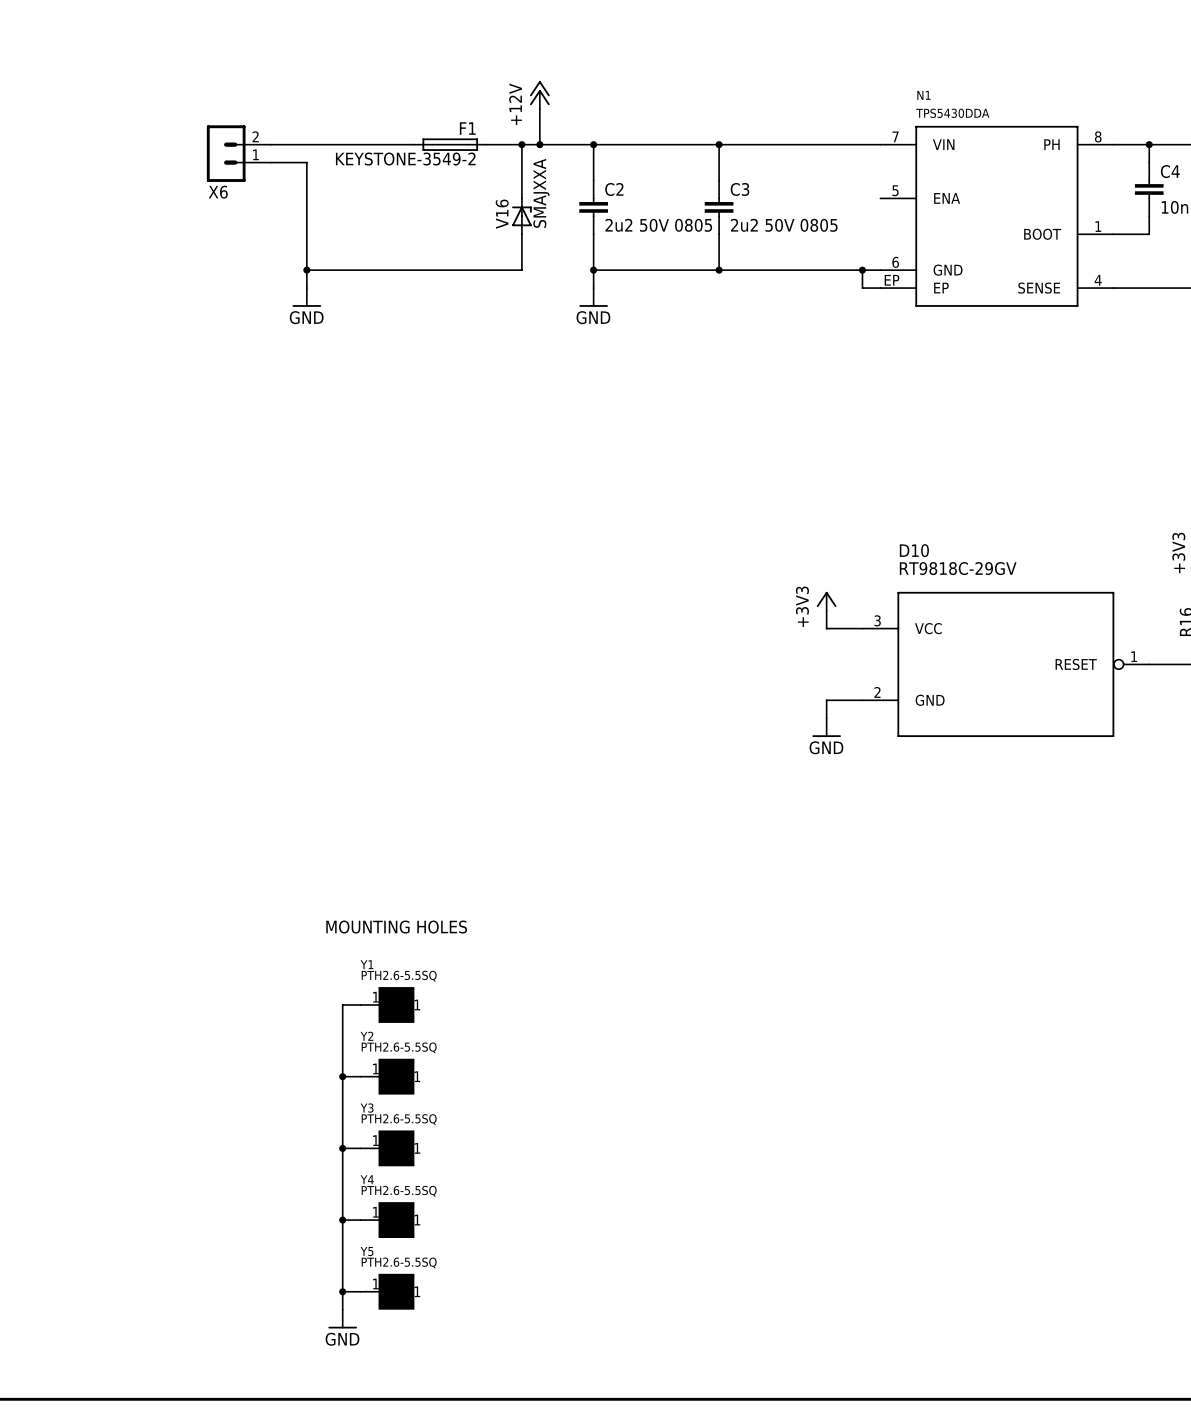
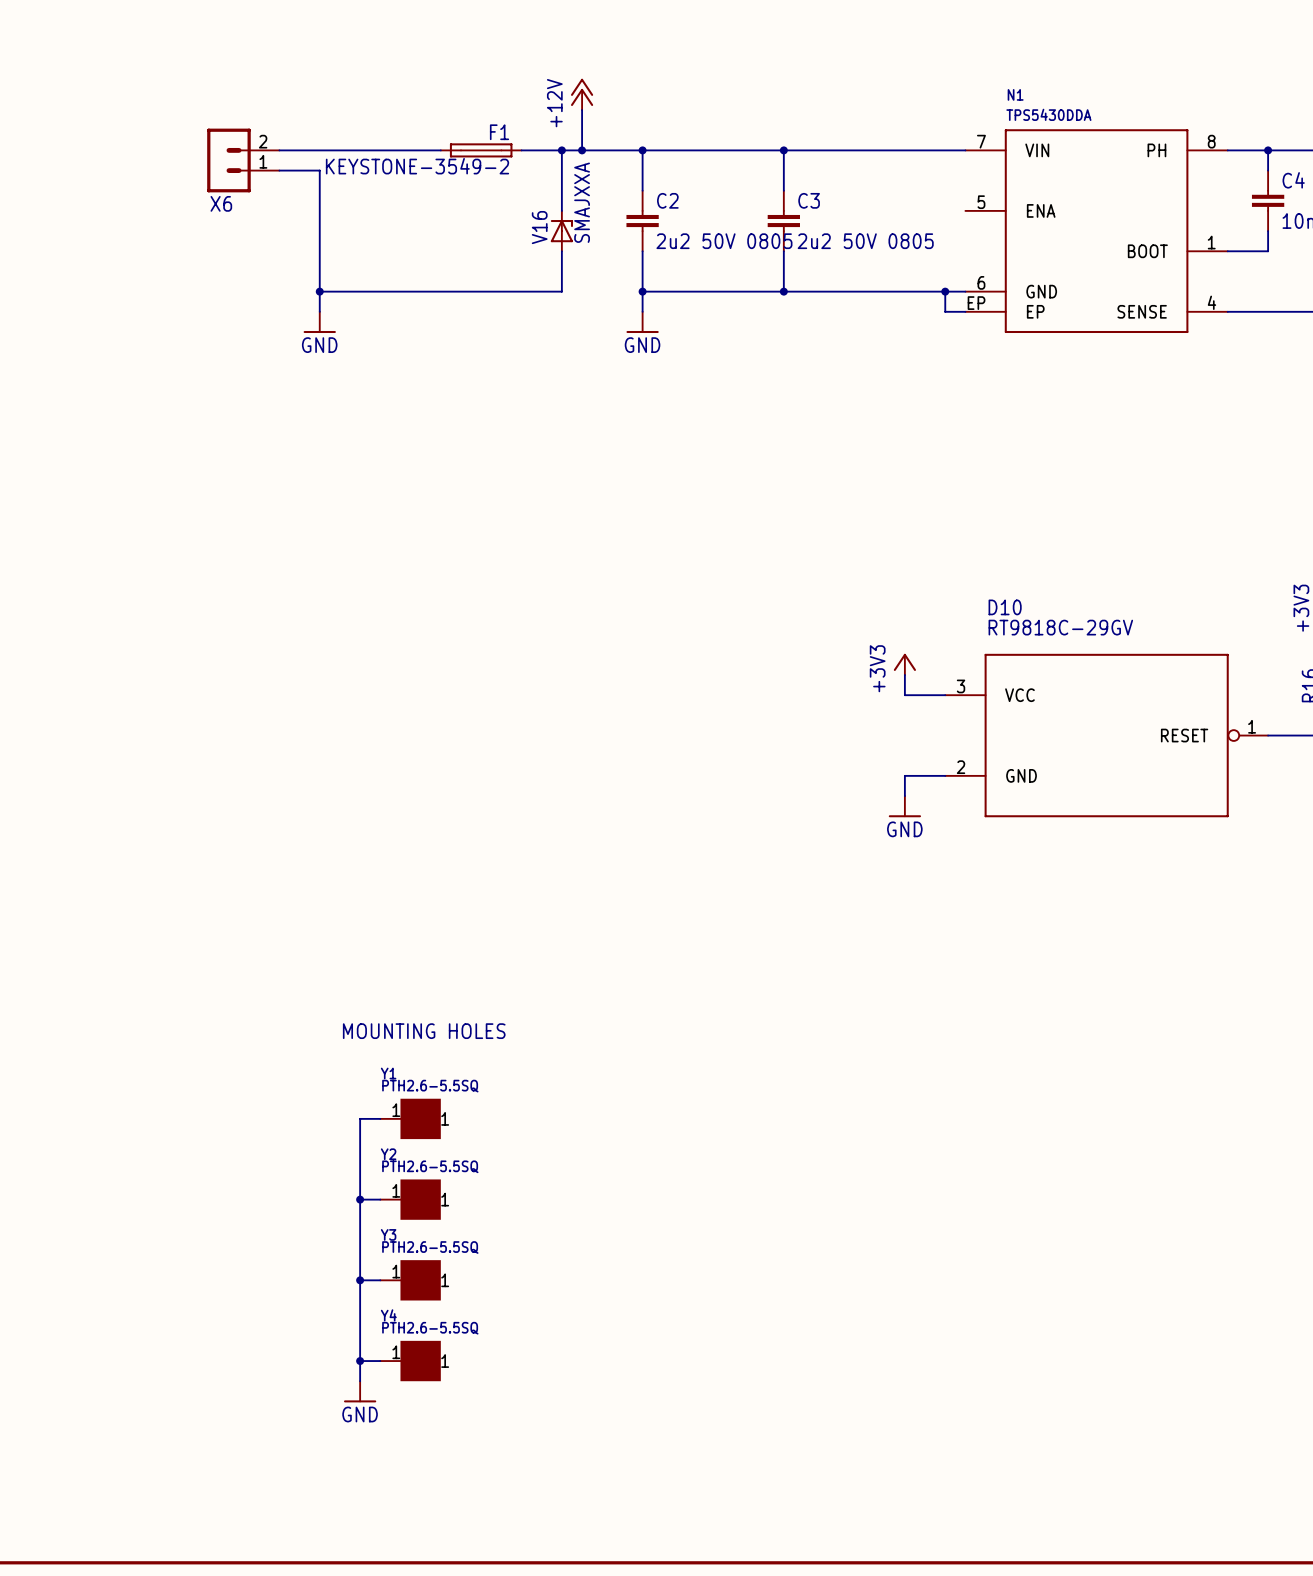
wire: (342, 1237) (342, 1309) -> none
wire: (342, 1291) (360, 1291) -> none
junction: (342, 1291) -> none
Y5: PTH2.6-5.5SQ (387, 1291) -> none
power symbol position: GND (342, 1319) -> GND (360, 1391)

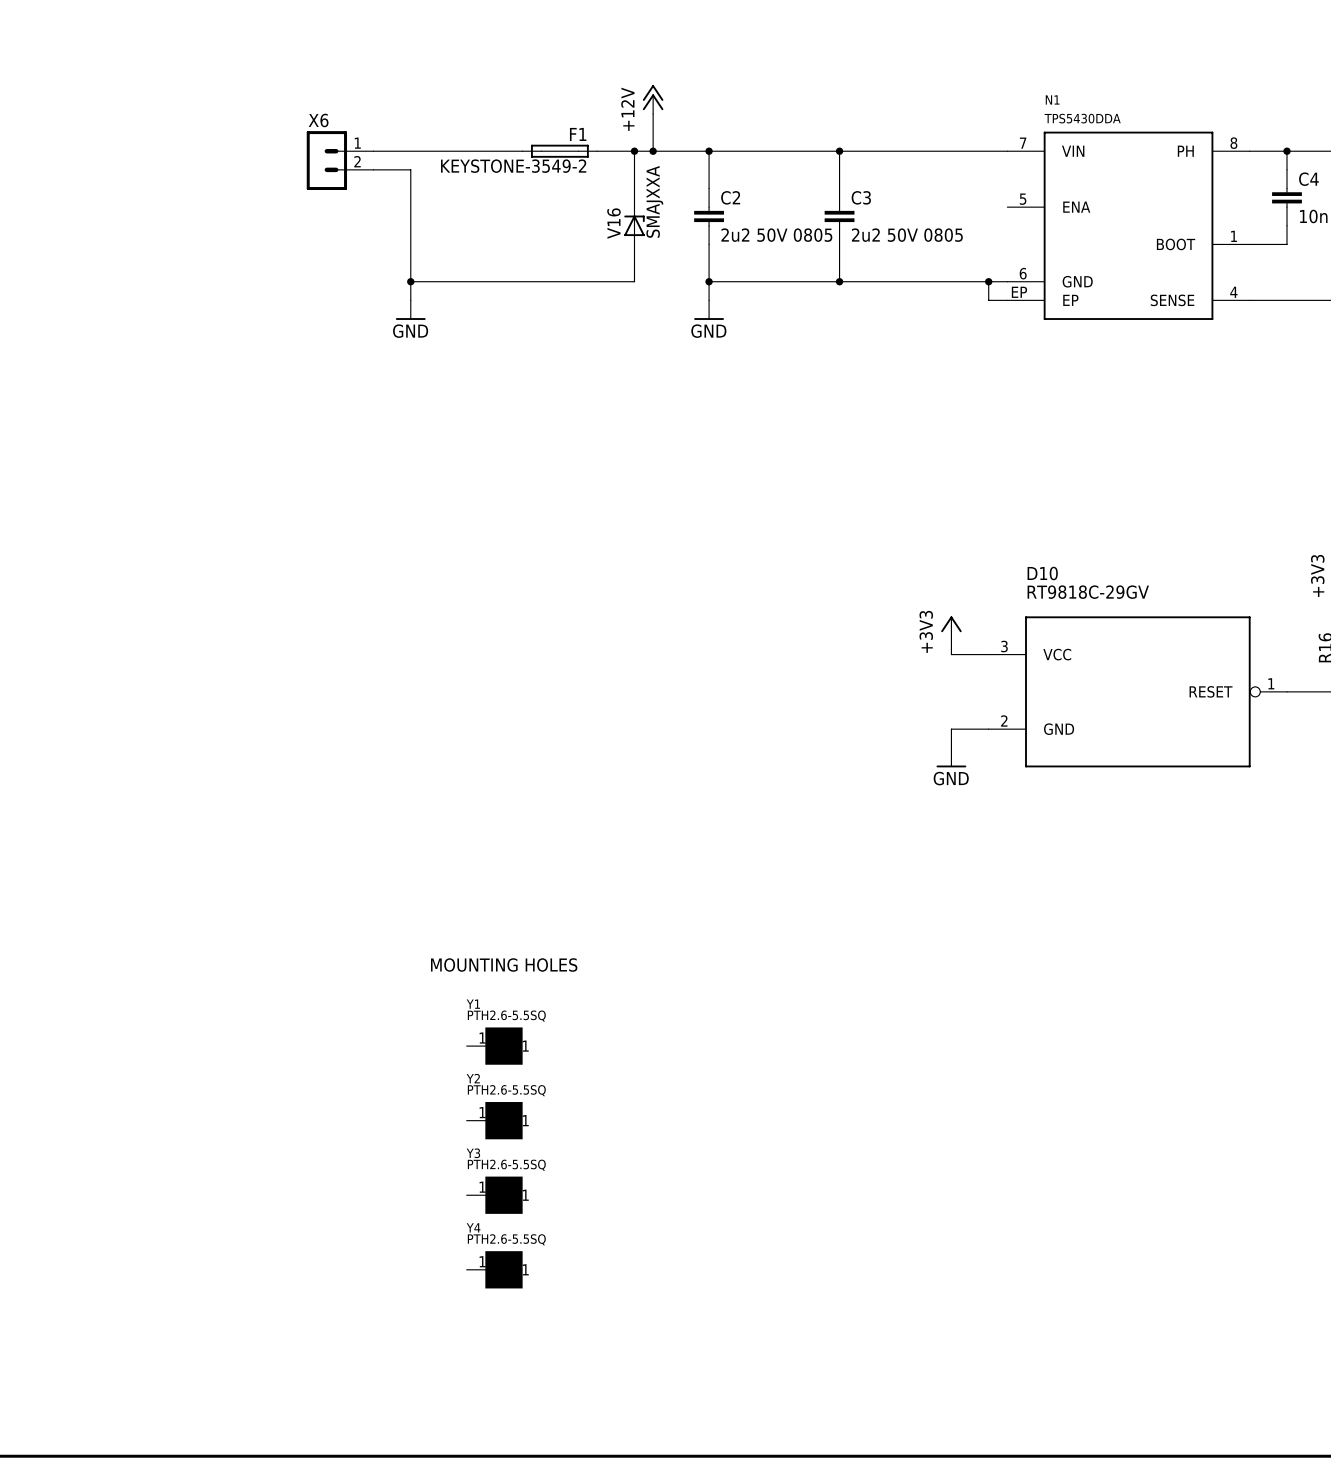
X6 flip: as is (228, 160) -> up-down (326, 160)
wire: (380, 1118) (360, 1118) (360, 1381) -> none
wire: (360, 1199) (380, 1199) -> none
junction: (360, 1199) -> none
wire: (360, 1280) (380, 1280) -> none
junction: (360, 1280) -> none
wire: (360, 1361) (380, 1361) -> none
junction: (360, 1361) -> none
power symbol: GND (360, 1391) -> none

